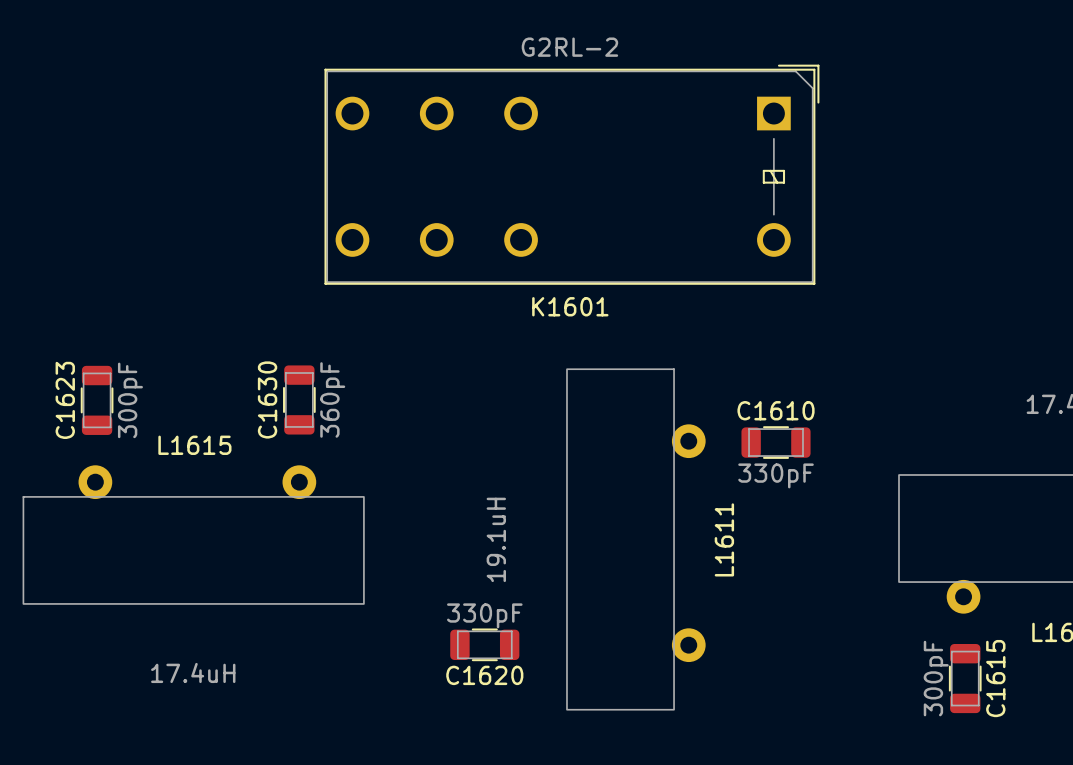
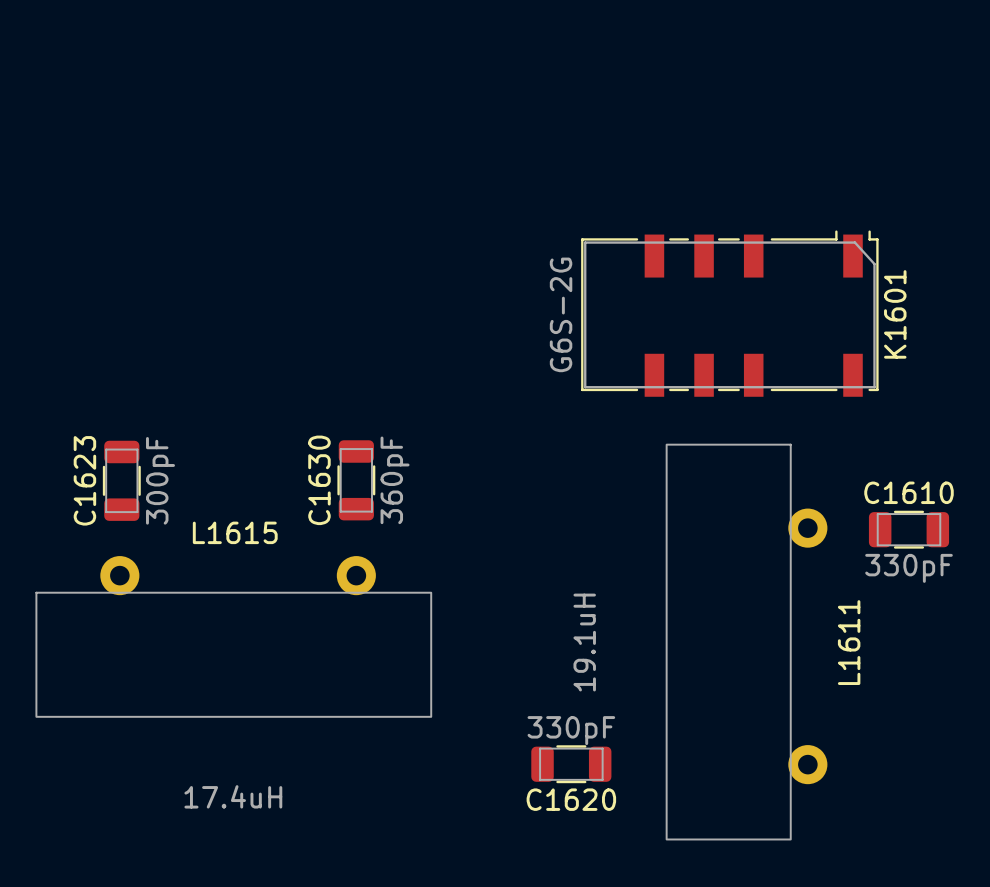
K1601 value: G2RL-2 (569, 47) -> G6S-2G (561, 314)
K1601 footprint: [324, 64, 820, 285] -> [581, 230, 879, 397]
K1601 name position: K1601 (570, 306) -> K1601 (895, 314)

